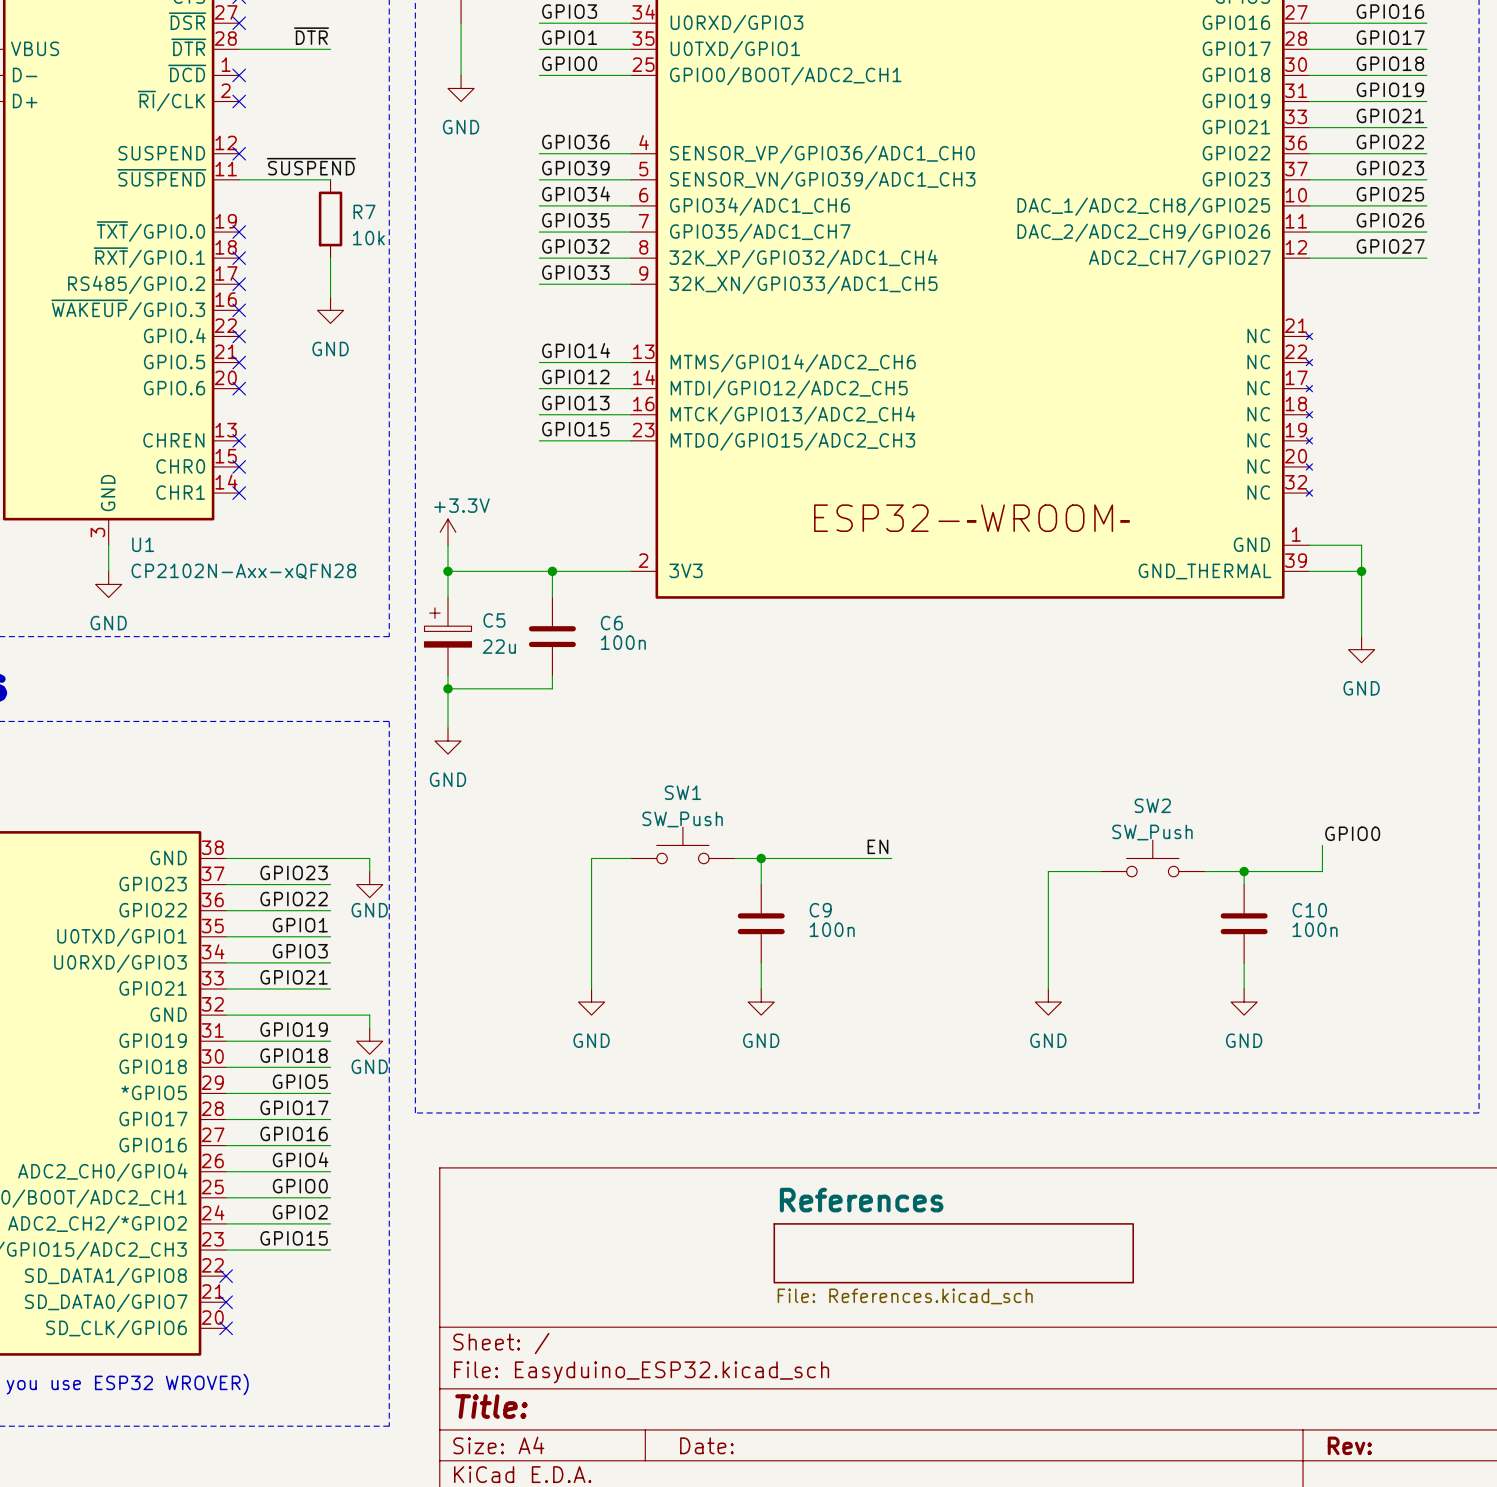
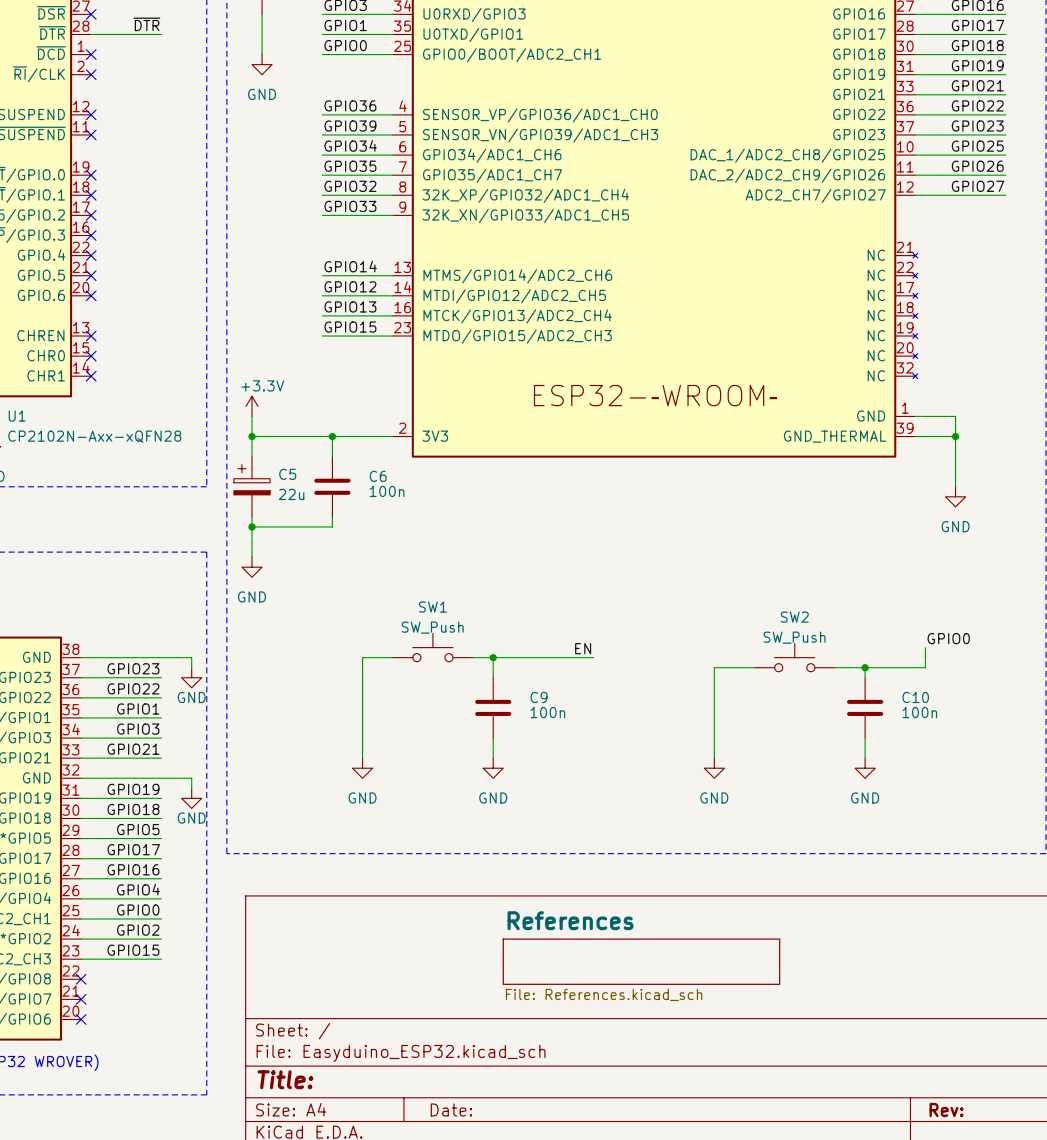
label: ~{SUSPEND} (311, 166) -> none
wire: (239, 179) (330, 179) -> none
no-connect mark: none -> (91, 134)
R7: 10k (330, 218) -> none
wire: (330, 258) (330, 297) -> none
power symbol: GND (330, 310) -> none

